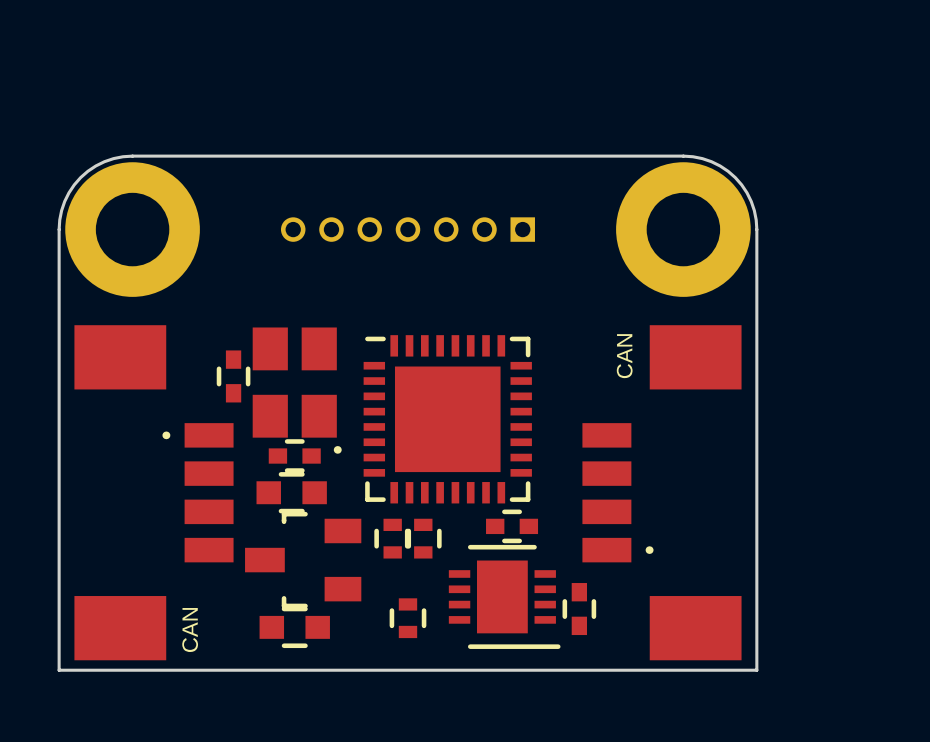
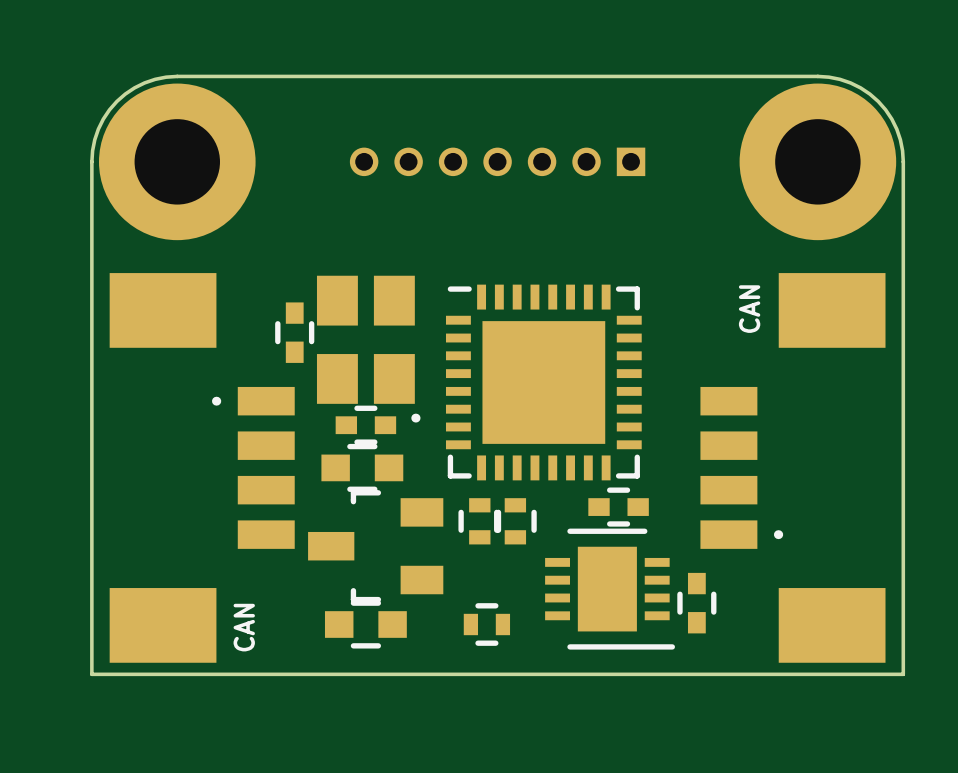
part rotation: 0° (407, 618) -> 90° clockwise (486, 624)

